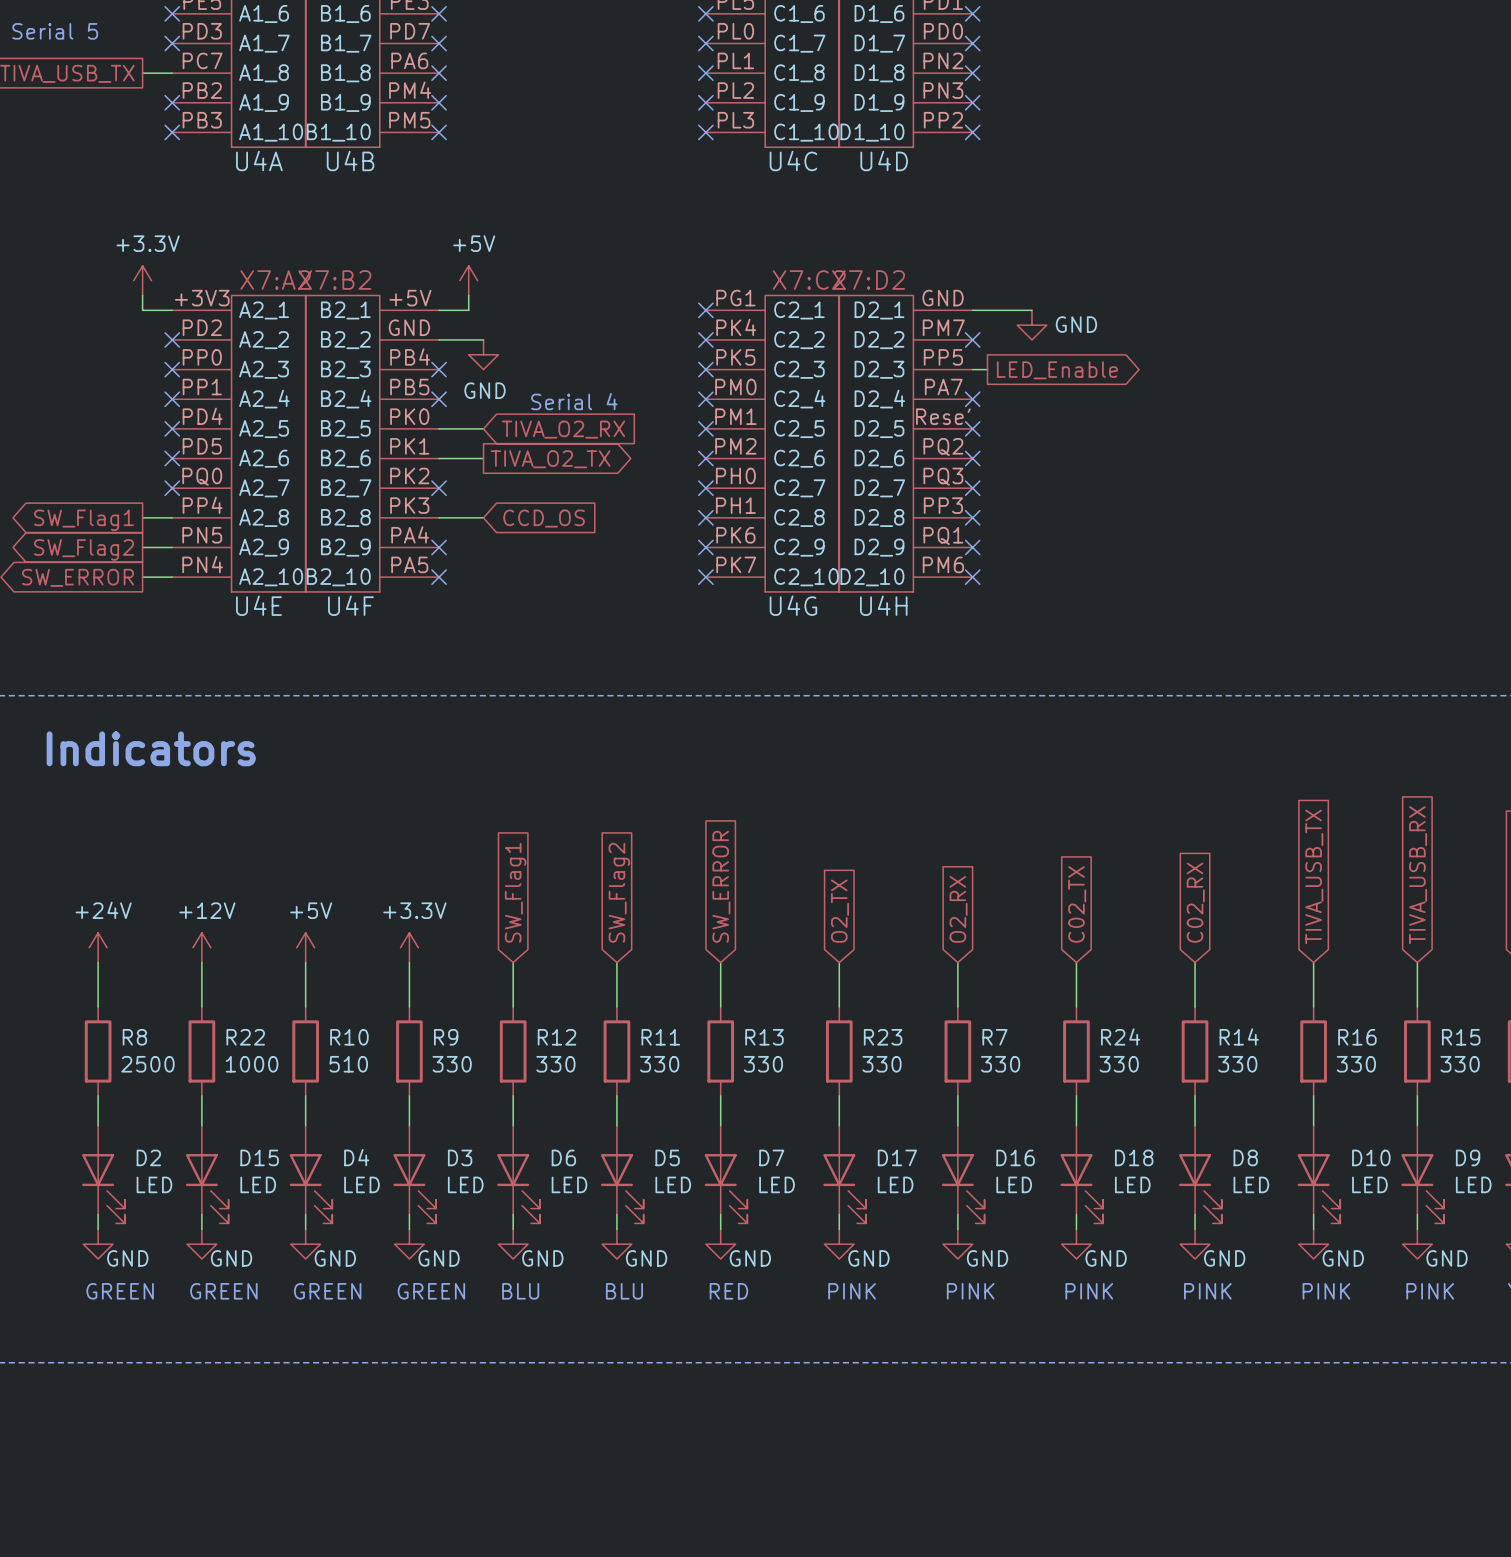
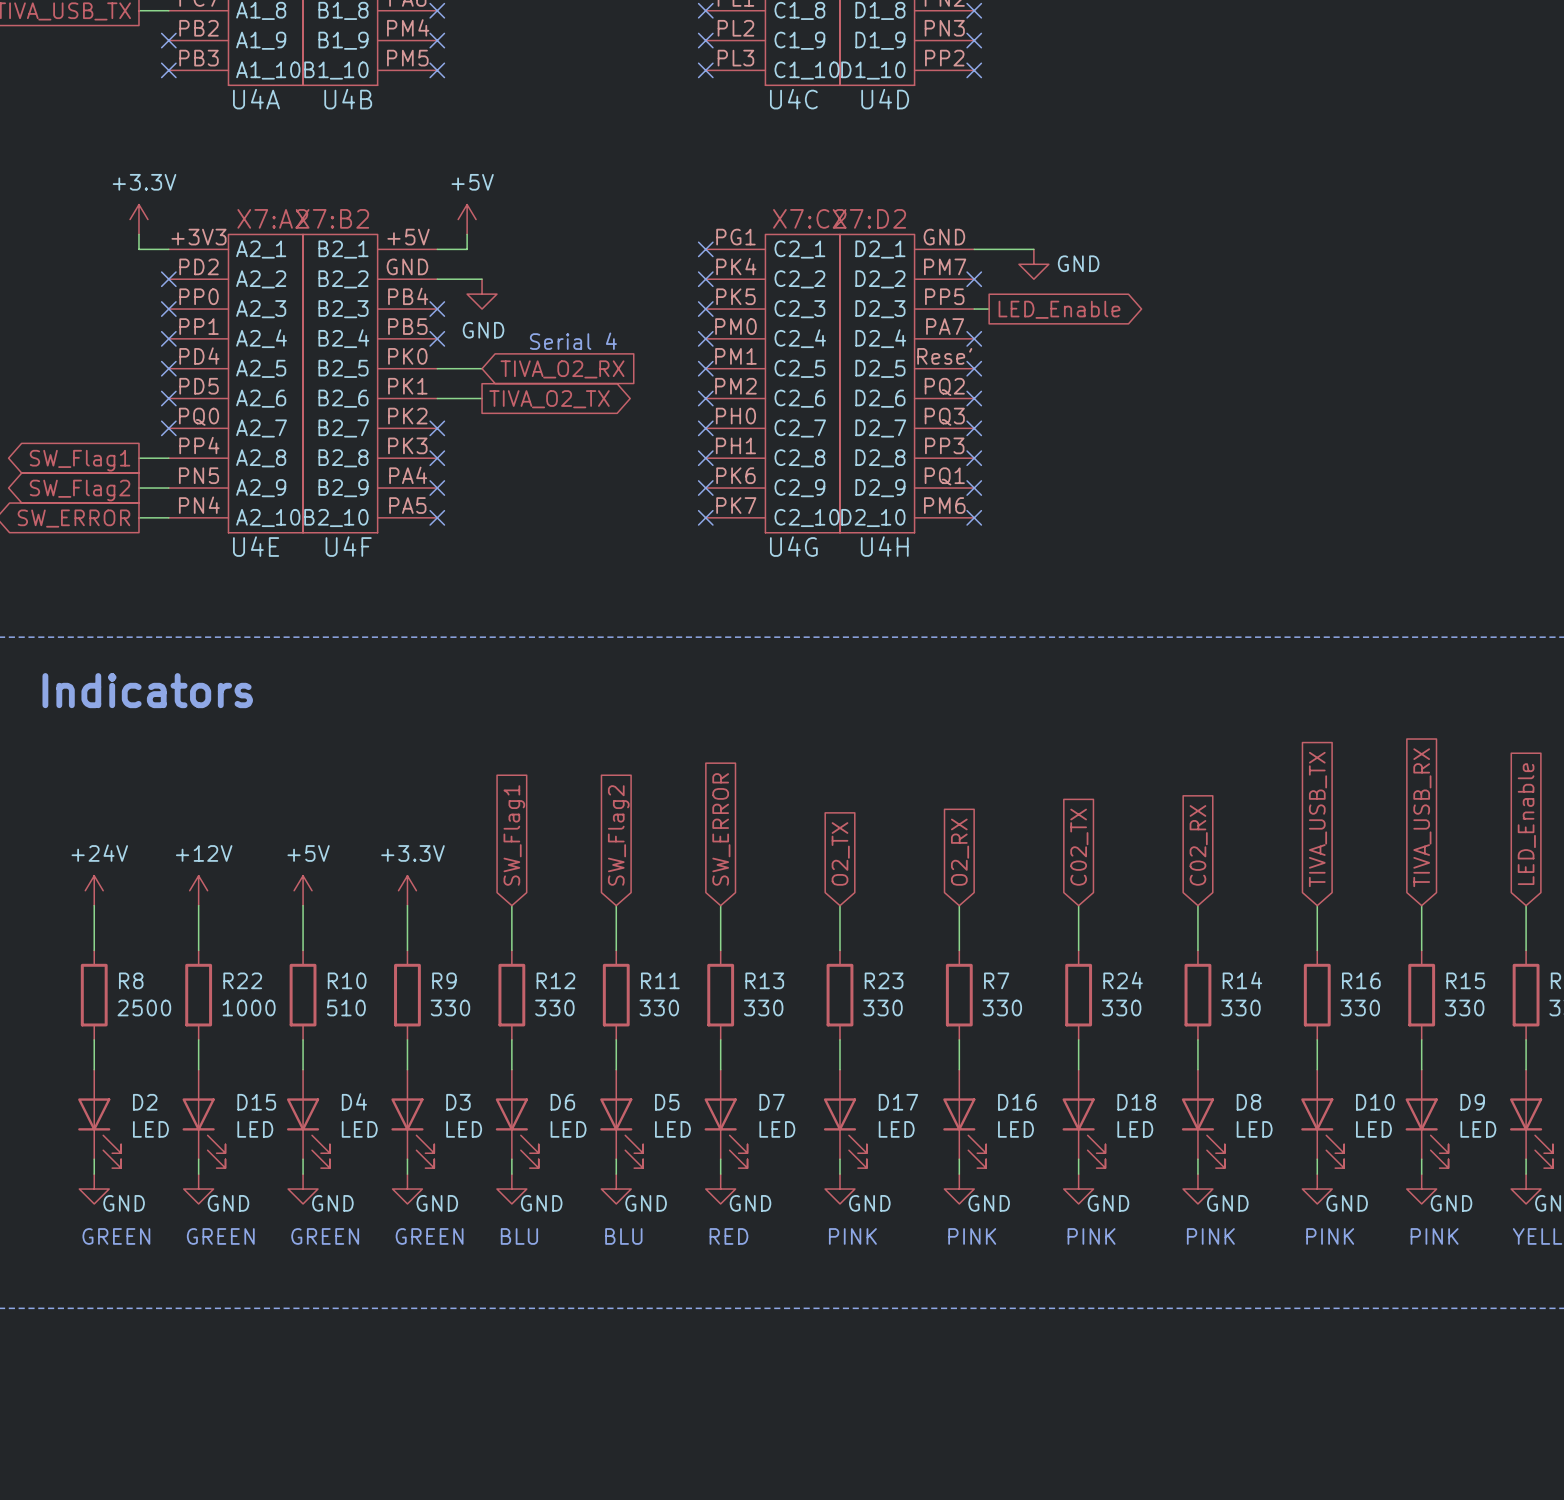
wire: (439, 517) (483, 517) -> none
no-connect mark: none -> (437, 458)
global label: CCD_OS (544, 518) -> none

